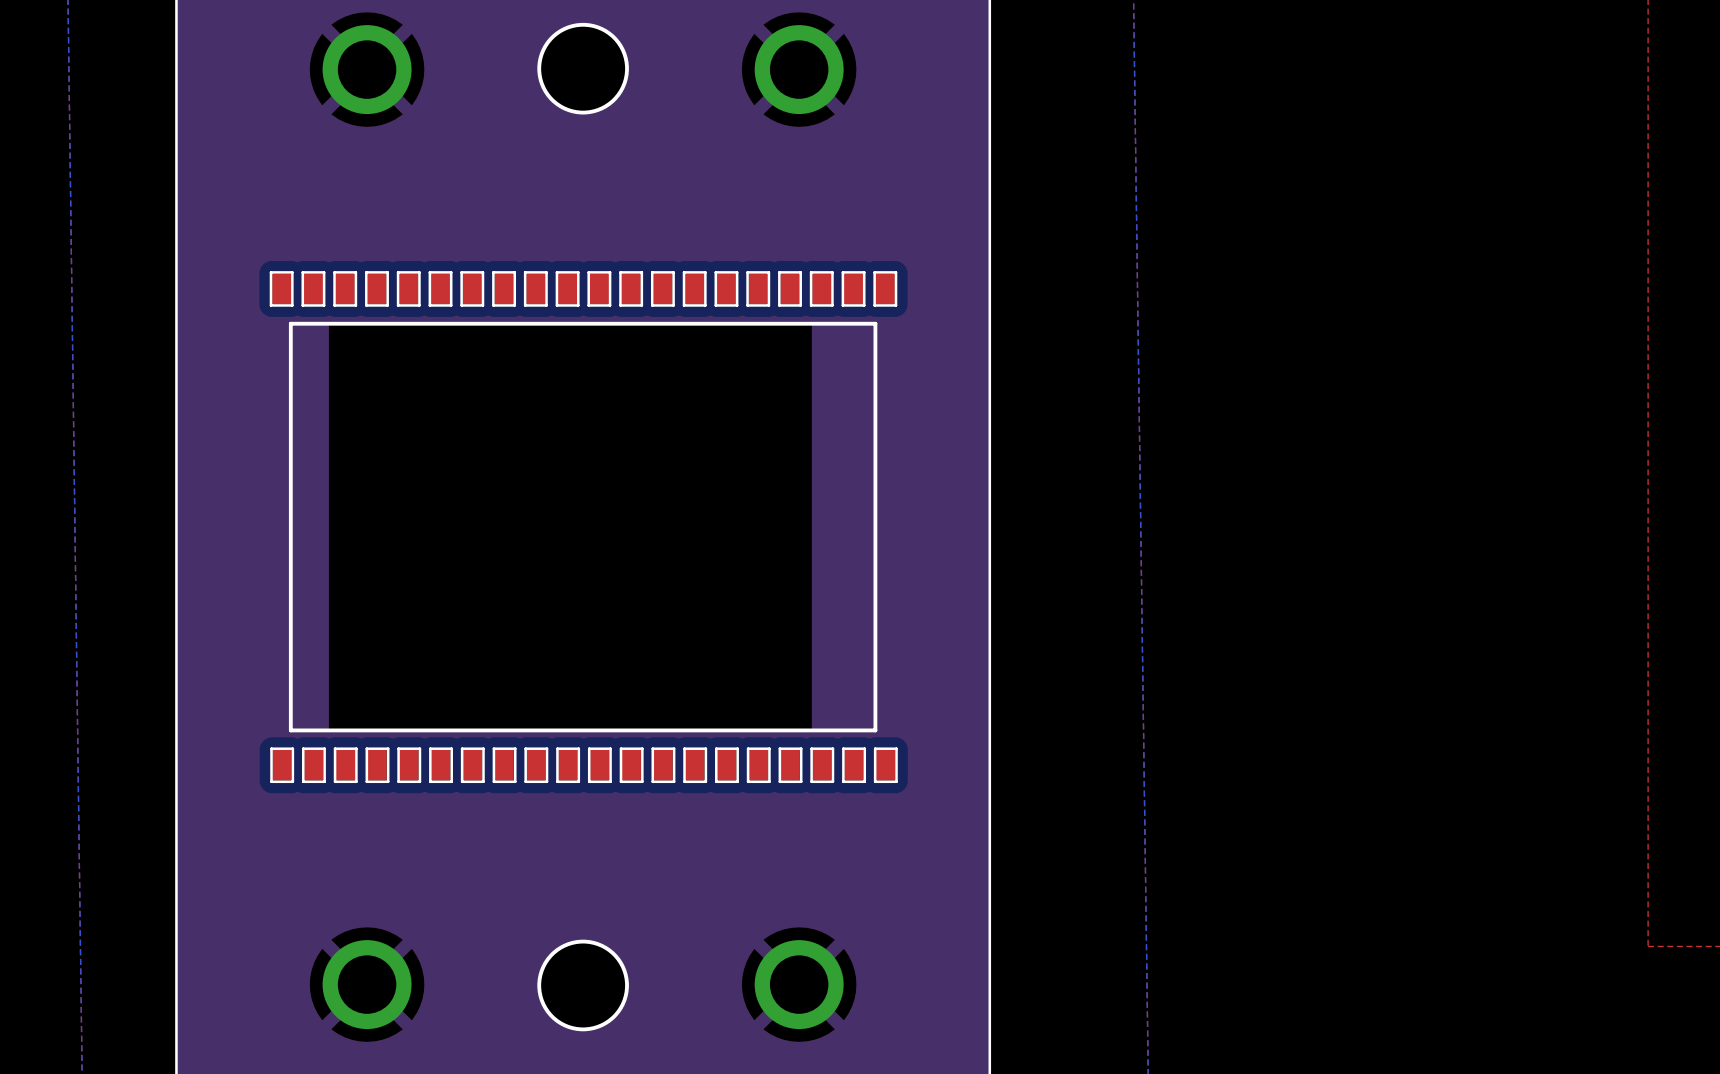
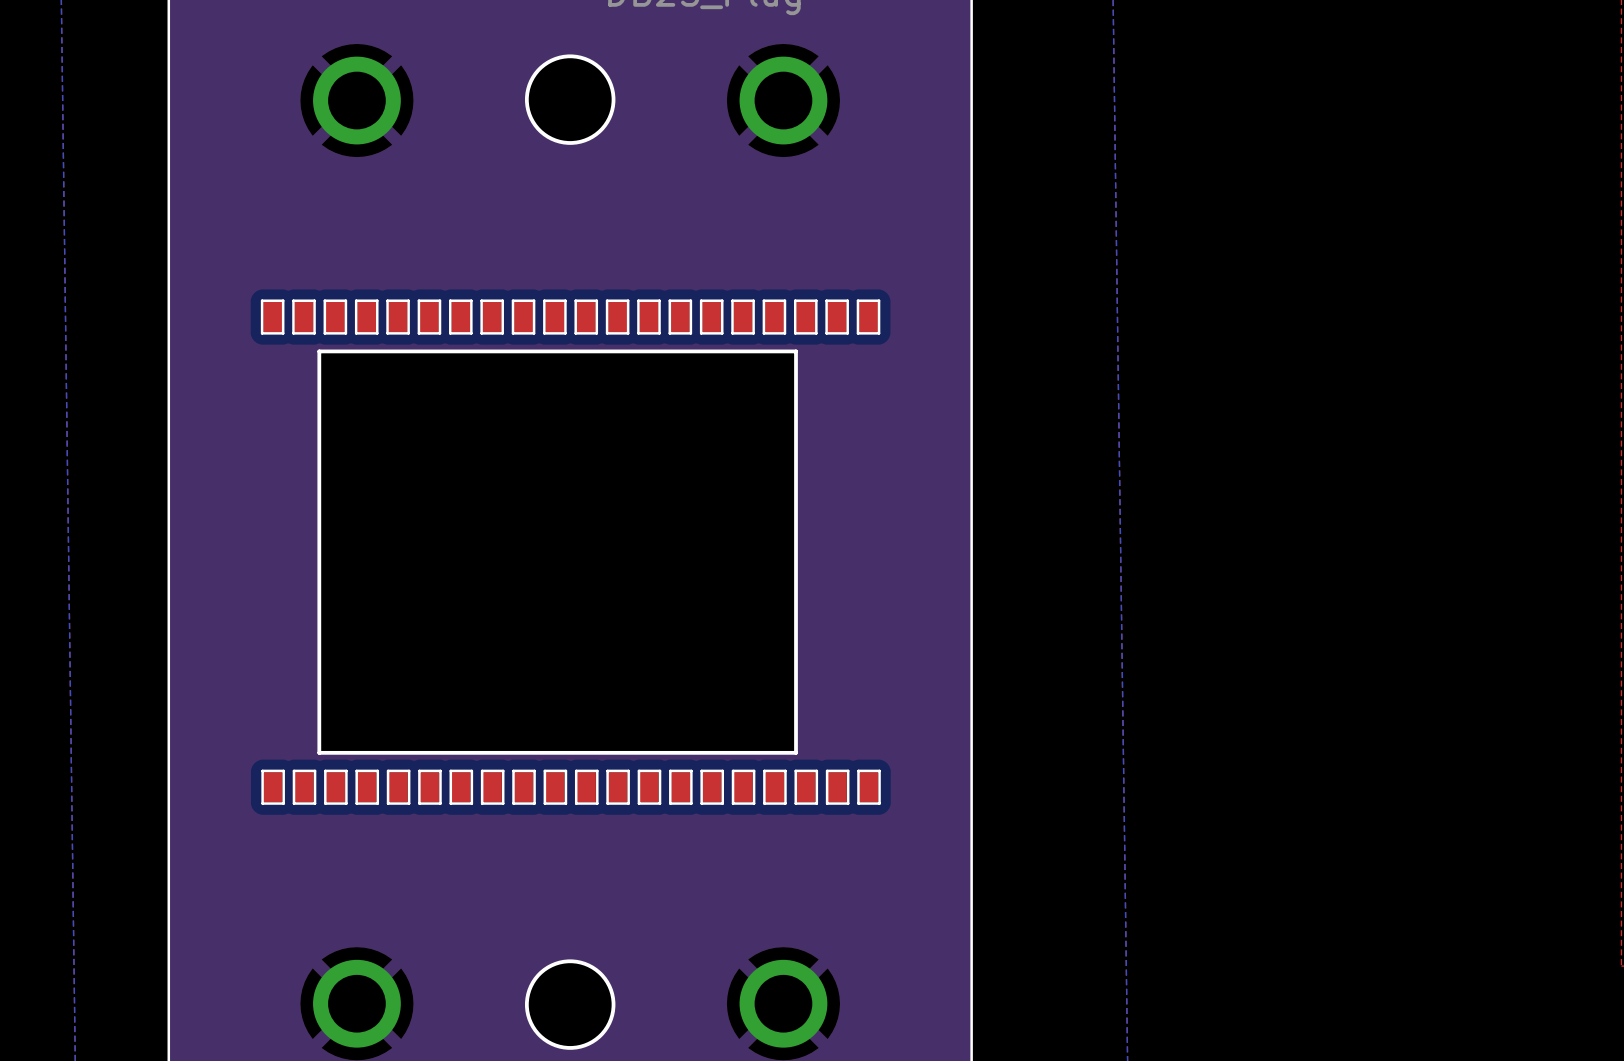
board edge: (328, 323) (290, 323) (290, 730) (328, 730) -> (319, 351) (319, 752)
board edge: (811, 323) (875, 323) (875, 730) (811, 730) -> (796, 351) (796, 752)

